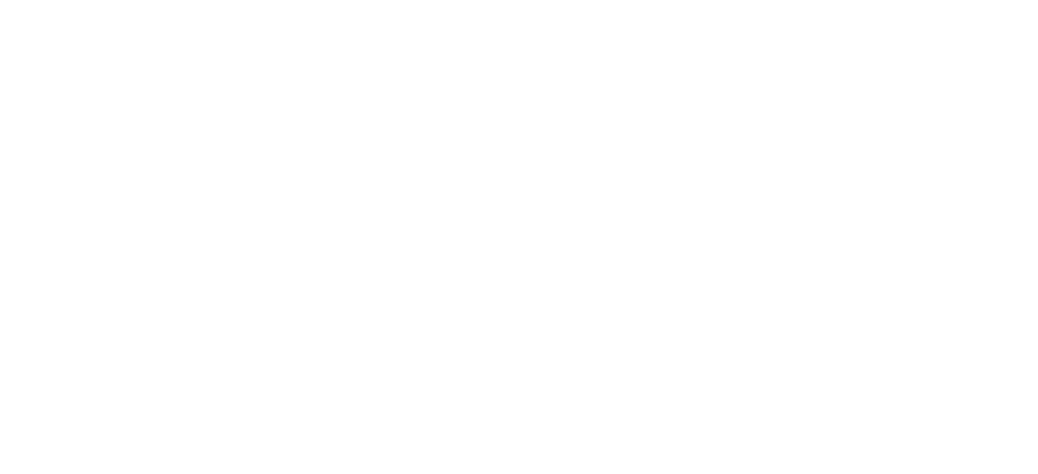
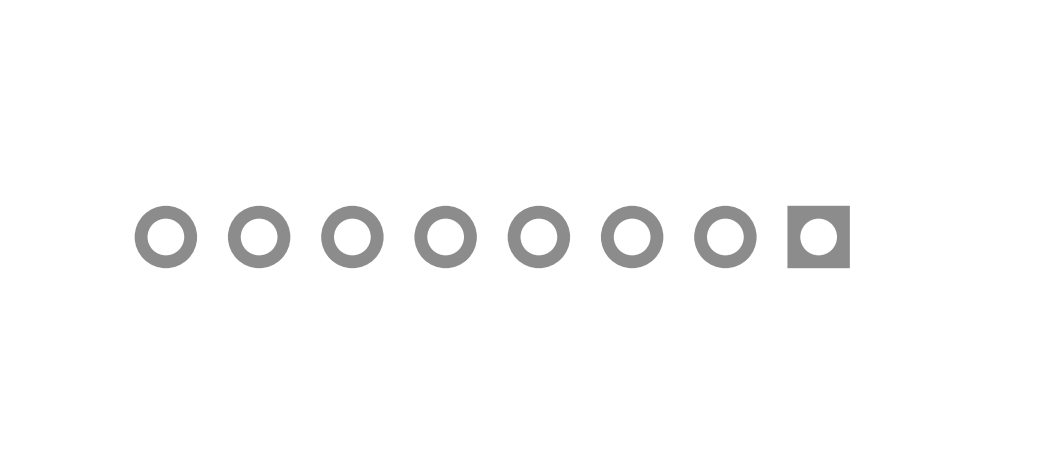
part: none -> (492, 236)

